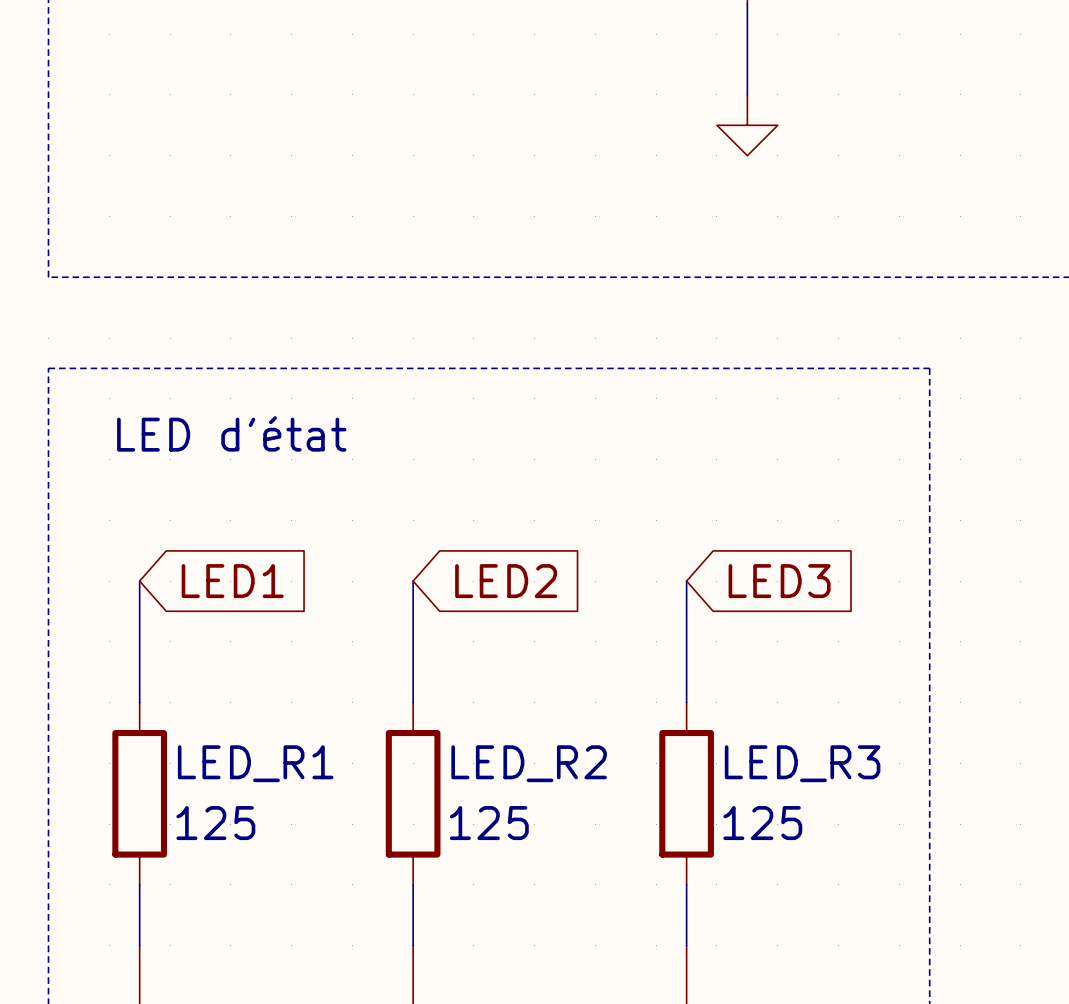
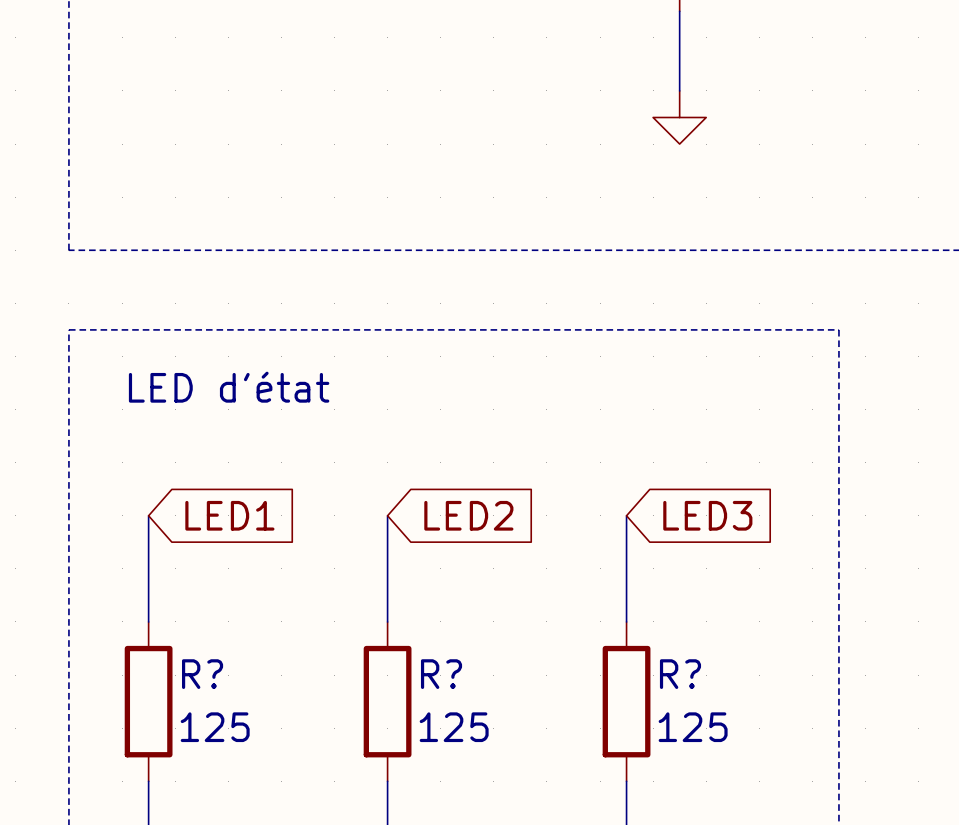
LED_R1 name: LED_R1 (255, 763) -> R? (202, 674)
LED_R2 name: LED_R2 (529, 763) -> R? (441, 674)
LED_R3 name: LED_R3 (802, 763) -> R? (680, 674)

